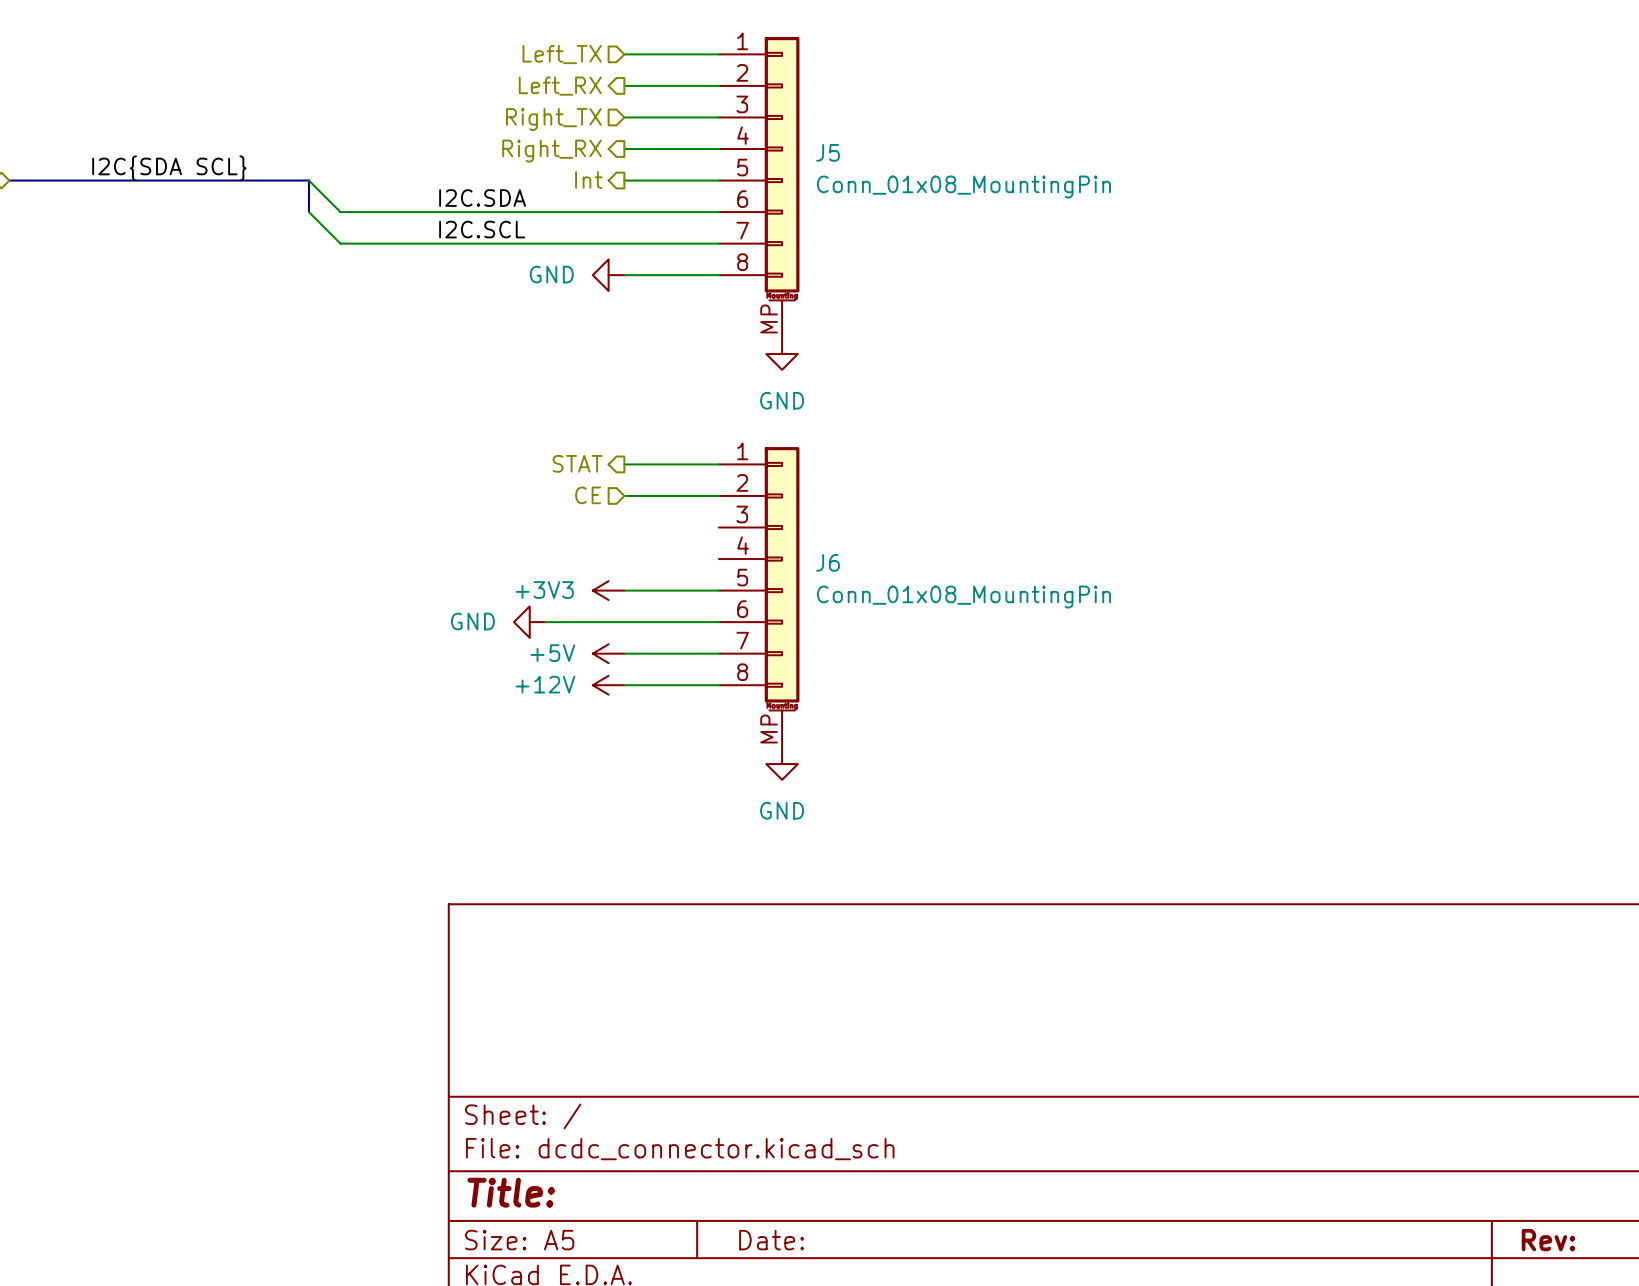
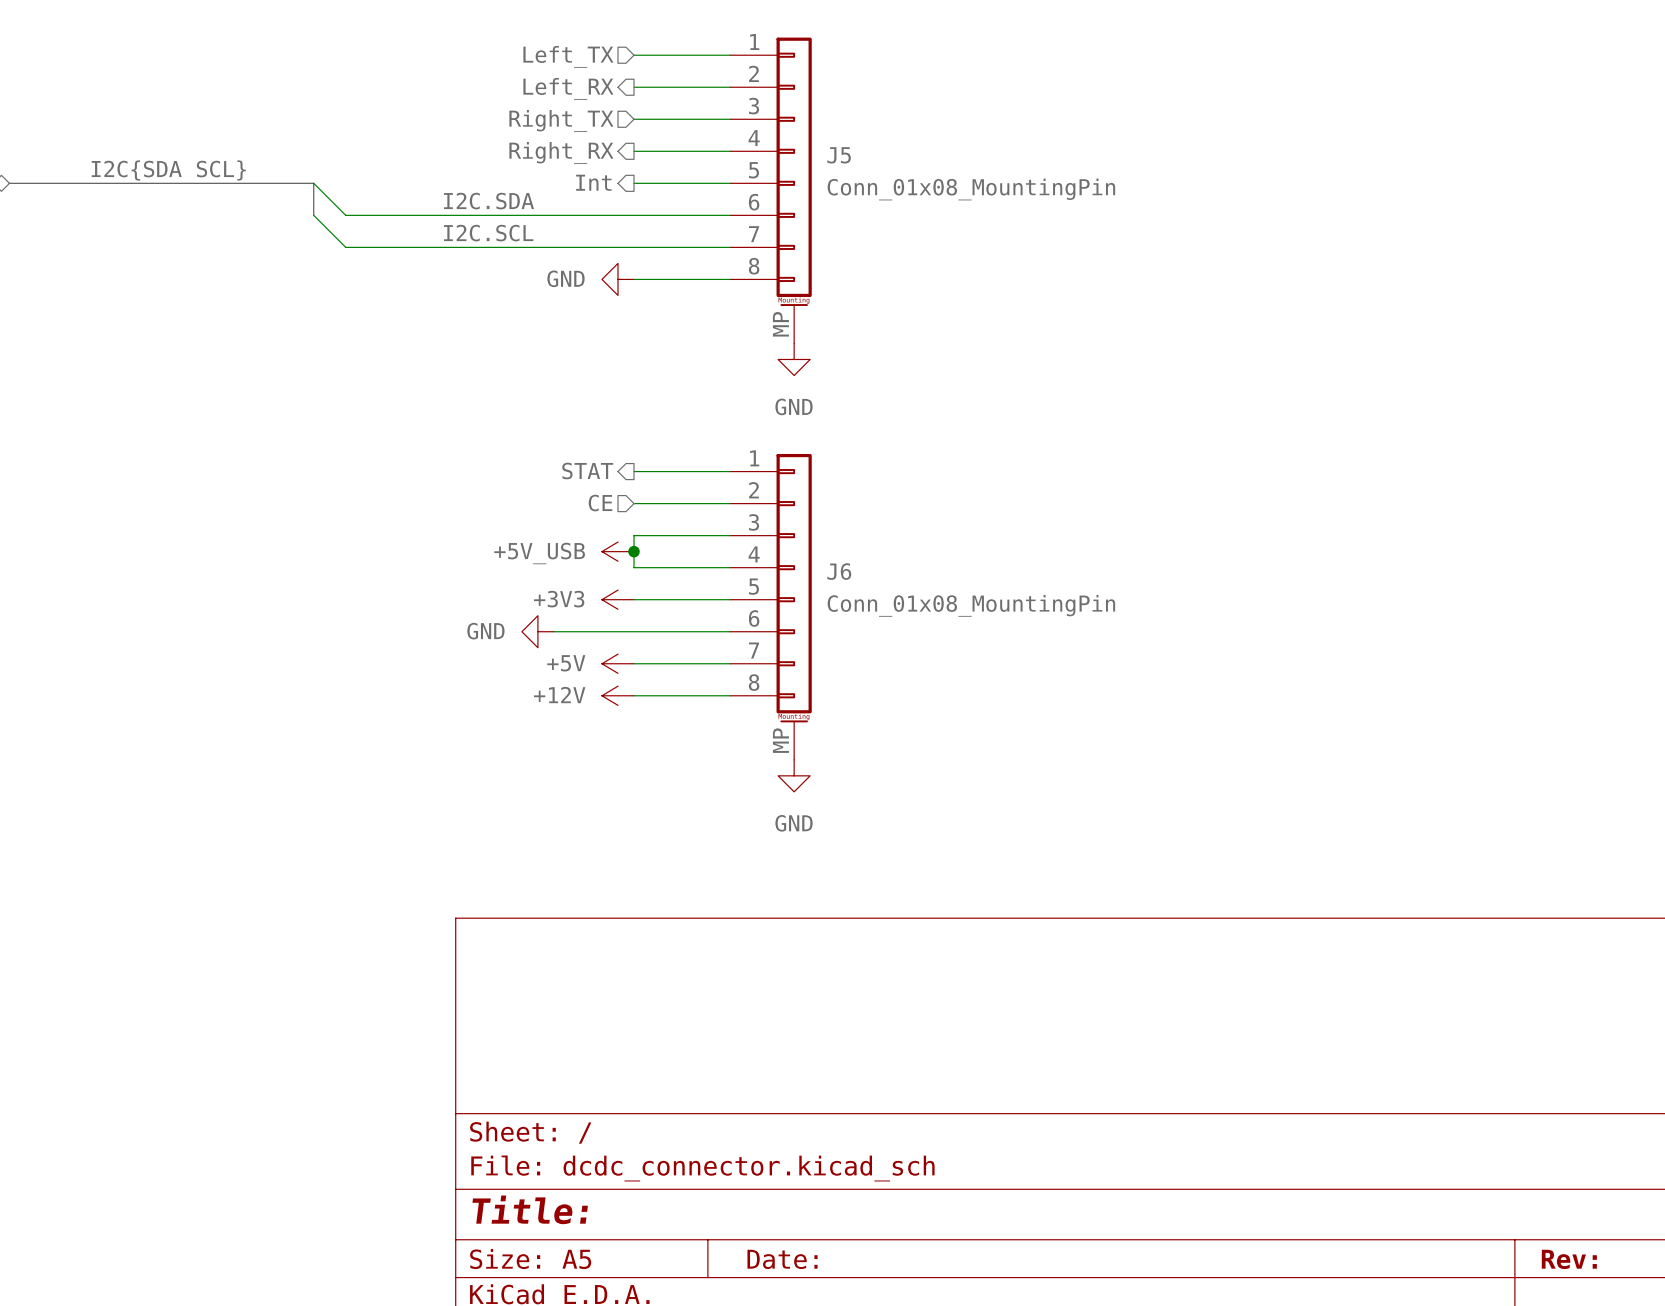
wire: none -> (730, 535) (634, 535) (634, 567) (730, 567)
power symbol: none -> +5V_USB (617, 551)
junction: none -> (634, 551)

